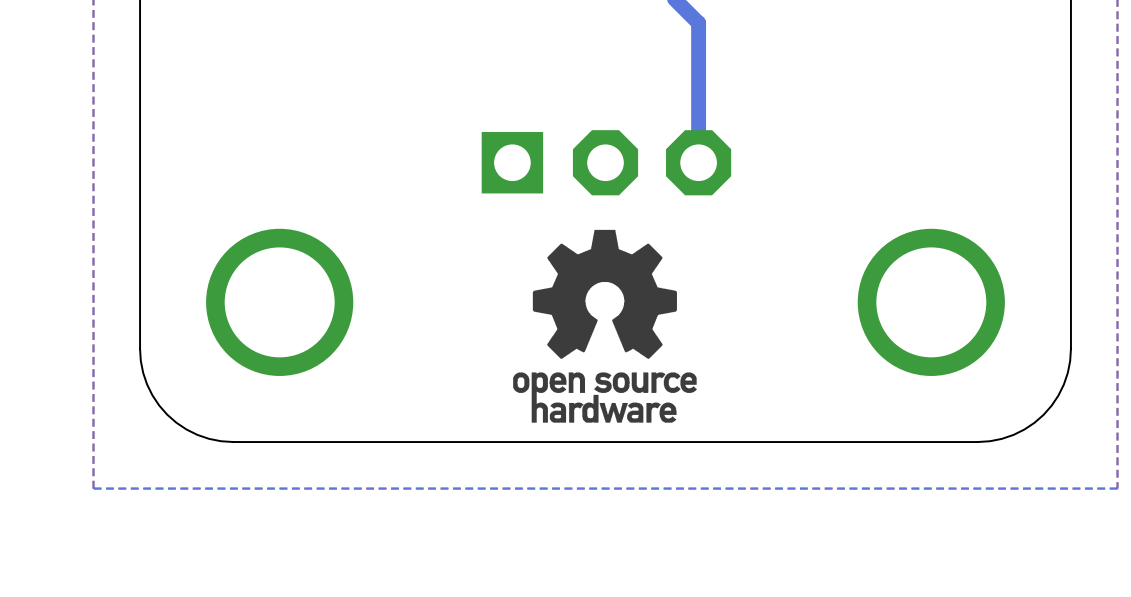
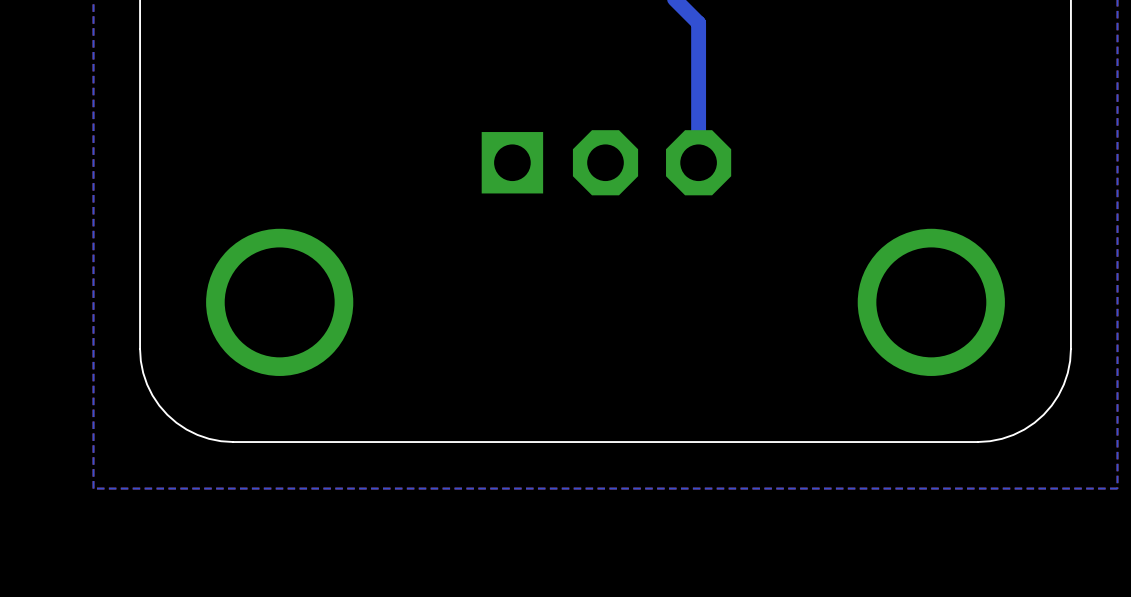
drawing: [513, 229, 697, 423] -> none

